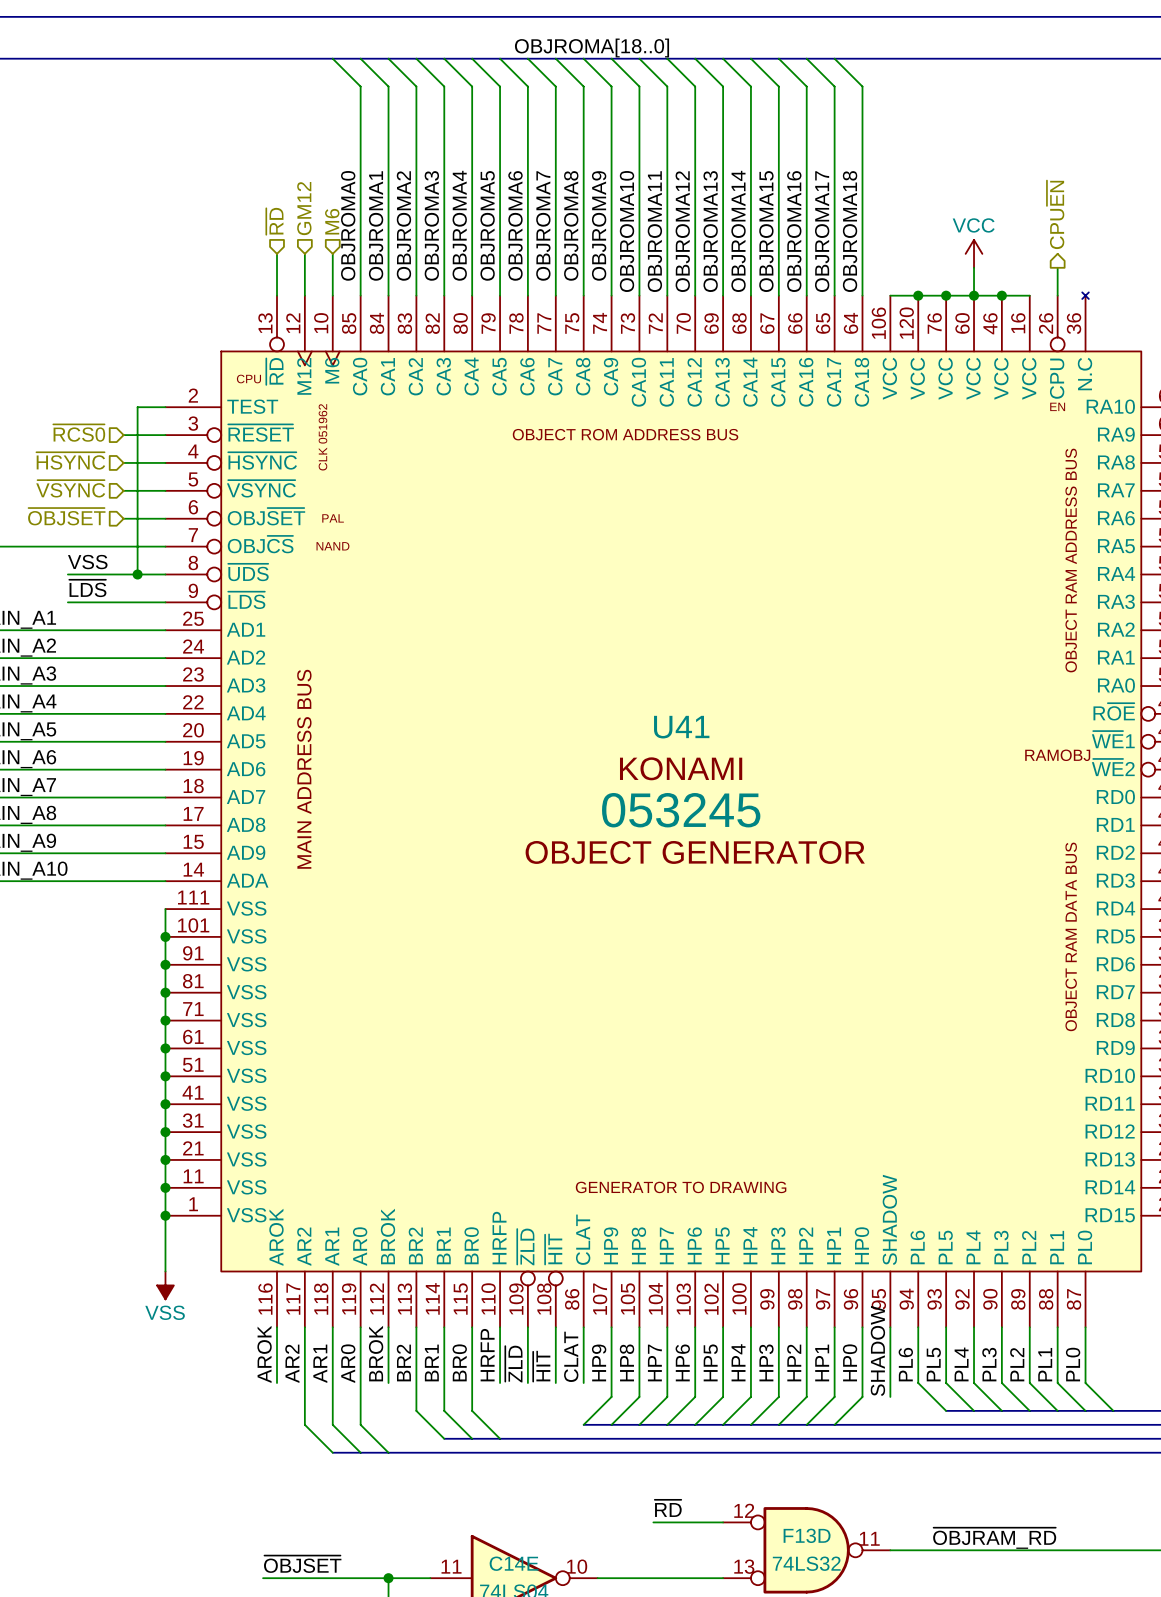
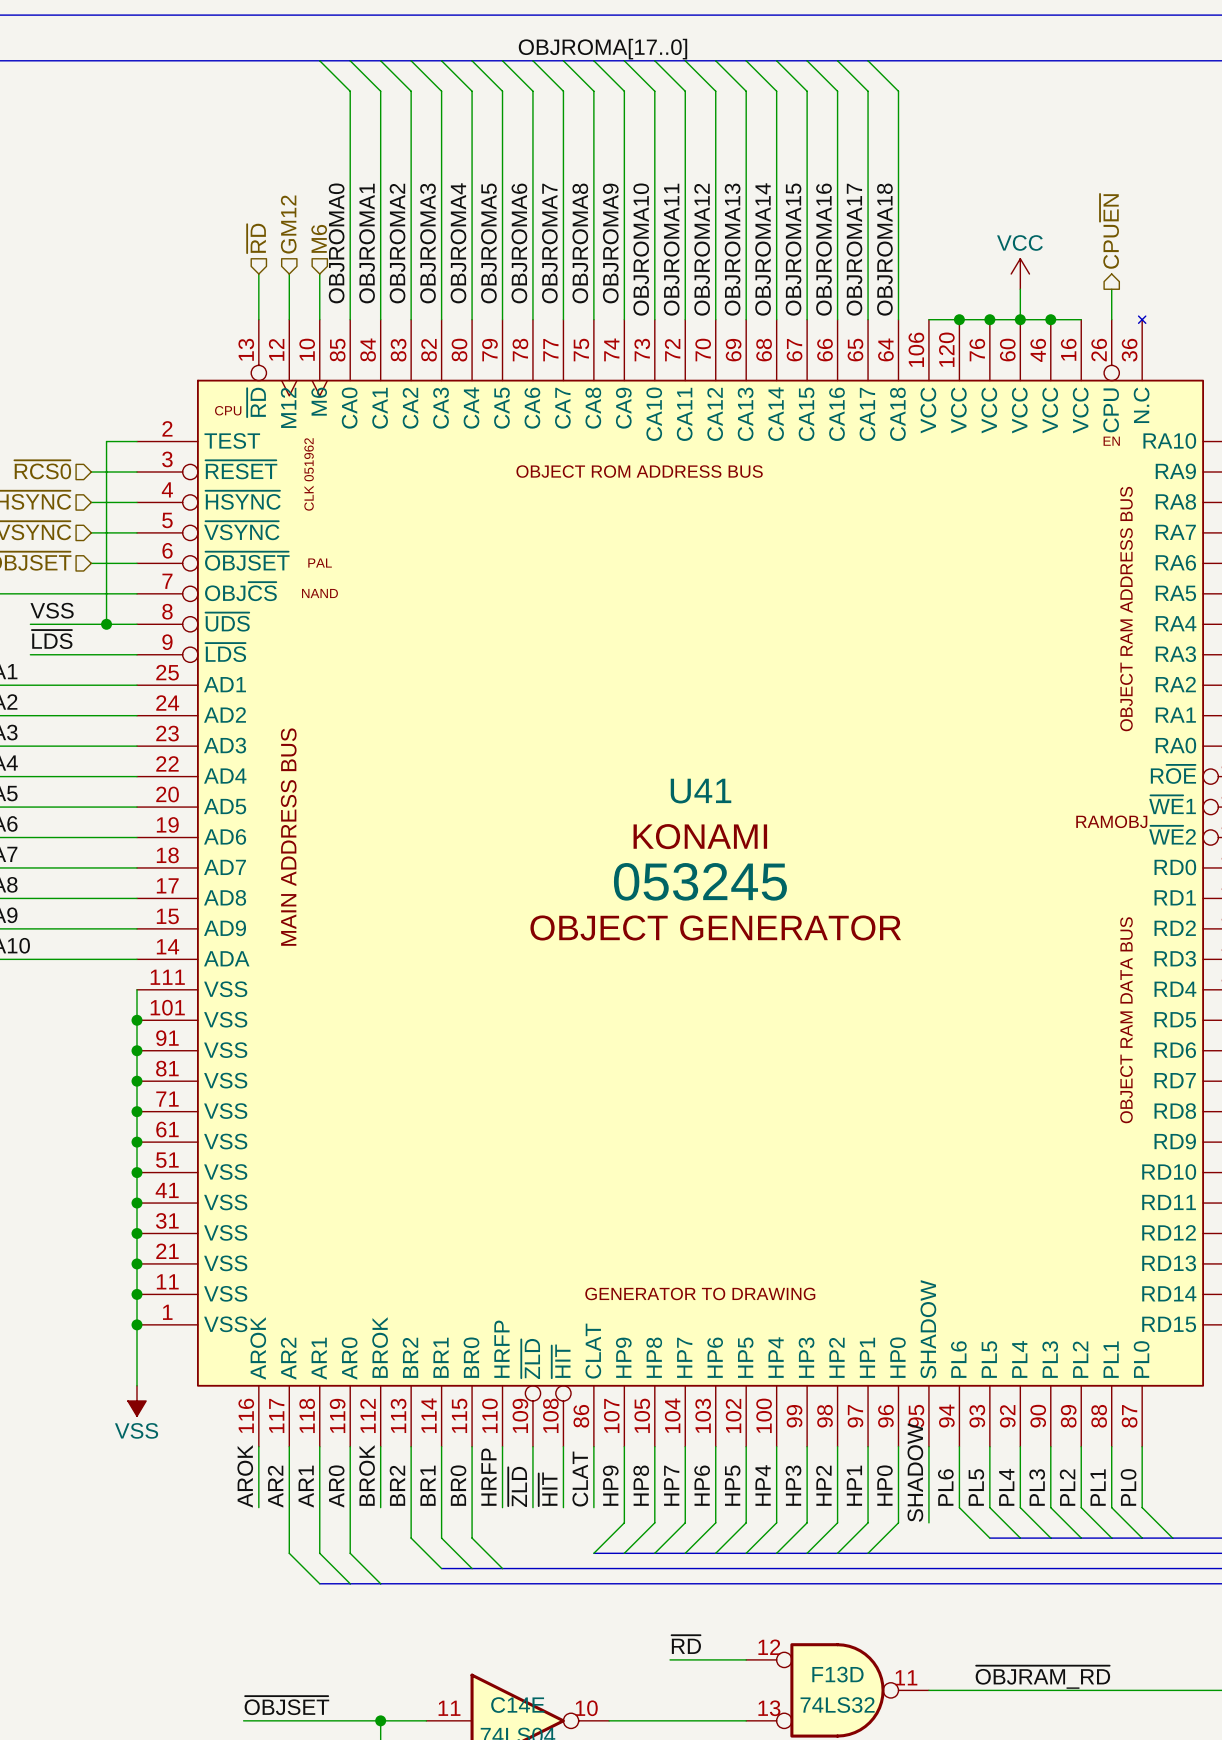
label: OBJROMA[18..0] (592, 47) -> OBJROMA[17..0] (602, 49)
U41 pin name: OBJ~{SET} (266, 516) -> ~{OBJSET} (247, 561)

